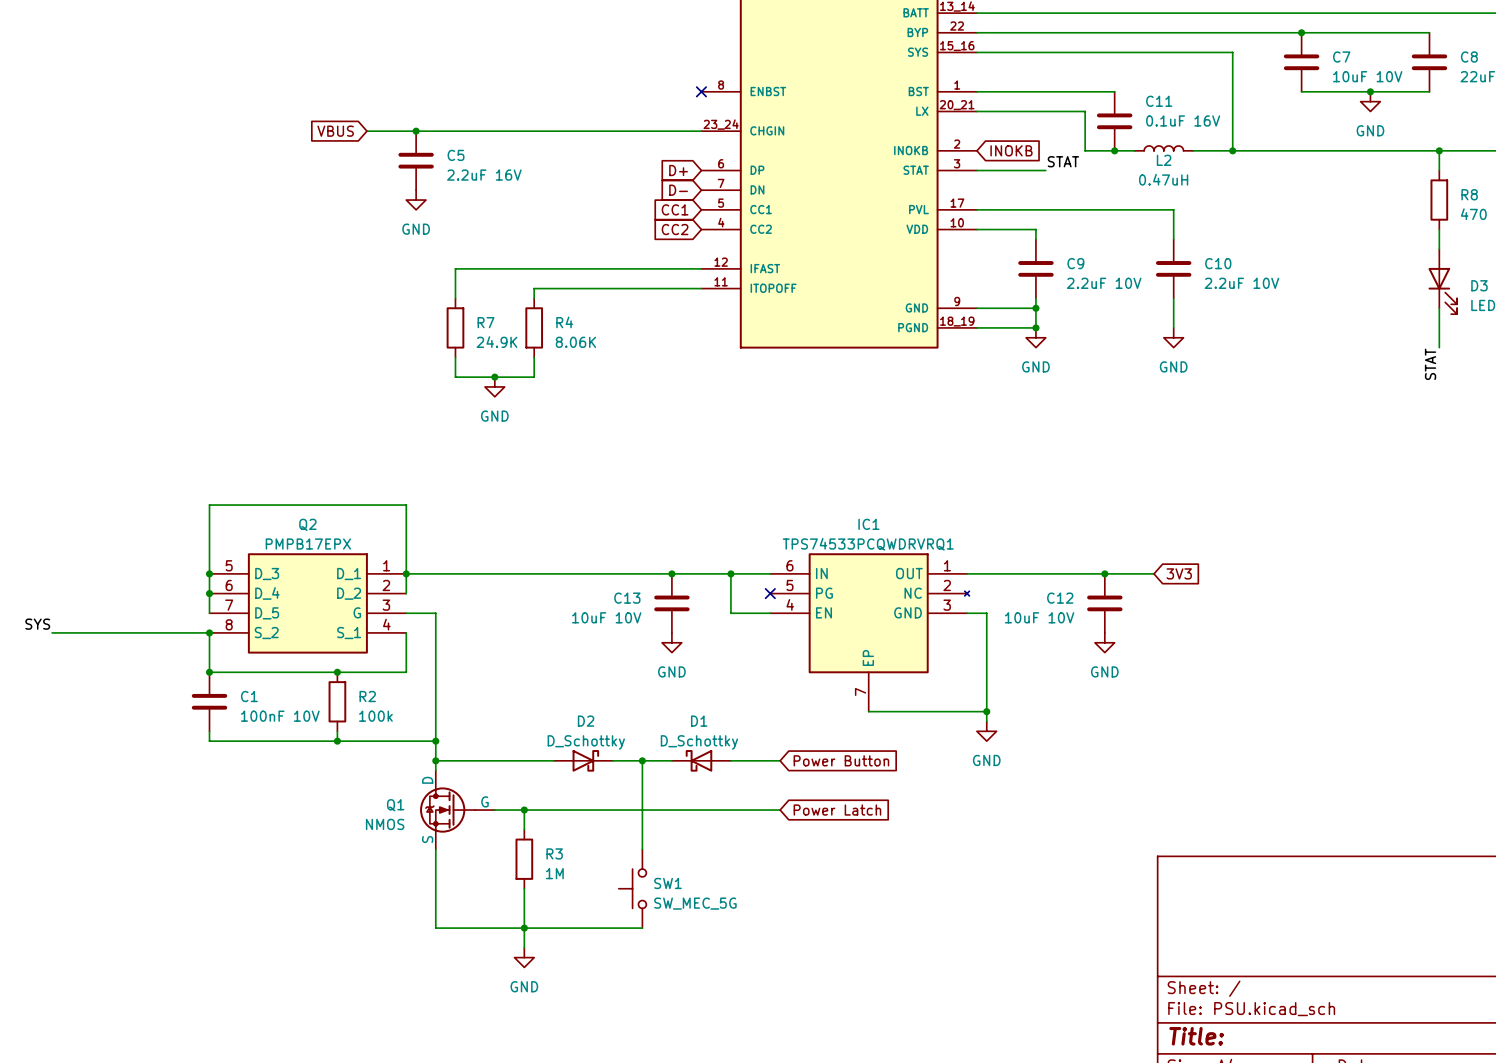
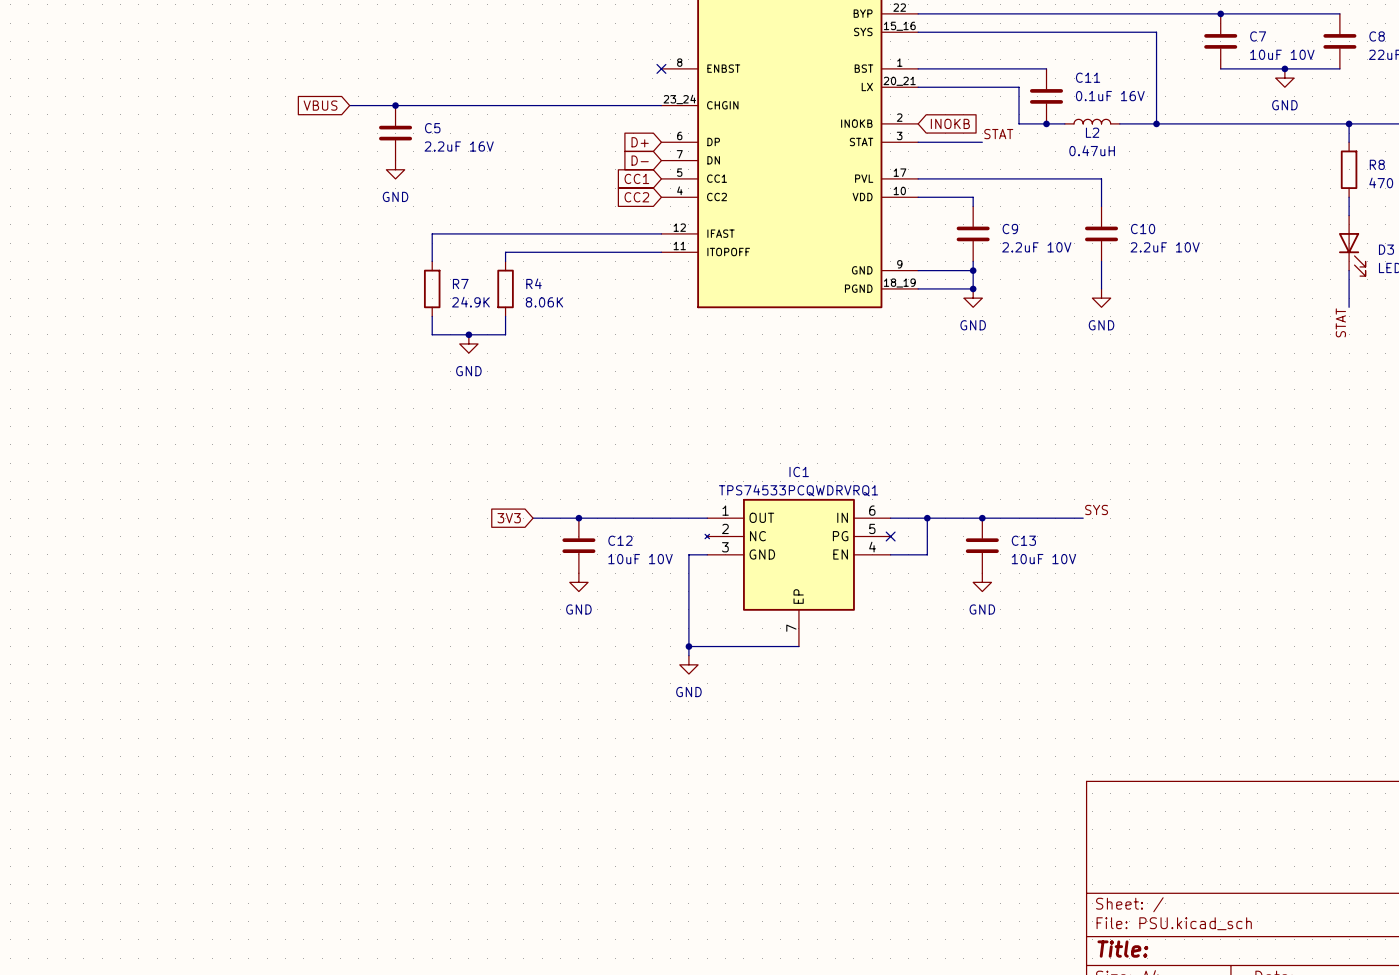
label: none -> SYS (1096, 509)
junction: (209, 573) -> none
wire: (406, 573) (563, 573) -> none
junction: (406, 573) -> none
global label: none -> 3V3 (509, 518)
junction: none -> (578, 518)
junction: (671, 573) -> none
wire: (730, 573) (730, 613) -> (688, 655) (688, 554)
junction: (730, 573) -> none
junction: none -> (927, 518)
junction: none -> (982, 518)
junction: (1104, 573) -> none
global label: 3V3 (1179, 573) -> none
junction: (209, 593) -> none
wire: (406, 593) (406, 505) (209, 505) (209, 613) -> none
no-connect mark: (770, 593) -> none
no-connect mark: none -> (890, 536)
C13 name position: C13 (627, 598) -> C13 (1023, 540)
C12 name position: C12 (1060, 598) -> C12 (620, 540)
Q2: PMPB17EPX (307, 603) -> none
C13 position: (671, 603) -> (982, 545)
C12 position: (1104, 603) -> (578, 545)
wire: (406, 613) (435, 613) (435, 770) -> none
IC1 flip: as is (889, 613) -> left-right (779, 554)
wire: (986, 613) (986, 721) -> (927, 554) (927, 518)
C13 value position: 10uF 10V (606, 617) -> 10uF 10V (1043, 559)
C12 value position: 10uF 10V (1039, 617) -> 10uF 10V (640, 559)
label: SYS (37, 624) -> none
wire: (52, 632) (209, 632) (209, 672) (406, 672) (406, 632) -> none
junction: (209, 632) -> none
power symbol: none -> GND (578, 582)
power symbol: GND (671, 642) -> none
power symbol: none -> GND (982, 582)
power symbol: GND (1104, 642) -> none
junction: (209, 672) -> none
junction: (337, 672) -> none
C1: 100nF 10V (209, 701) -> none
R2: 100k (337, 701) -> none
junction: none -> (688, 646)
wire: (868, 711) (986, 711) -> (688, 646) (798, 646)
junction: (986, 711) -> none
wire: (209, 731) (209, 741) (435, 741) -> none
wire: (337, 731) (337, 741) -> none
power symbol: none -> GND (688, 664)
power symbol: GND (986, 731) -> none
junction: (337, 741) -> none
junction: (435, 741) -> none
wire: (435, 760) (553, 760) -> none
junction: (435, 760) -> none
D2: D_Schottky (583, 760) -> none
wire: (612, 760) (671, 760) -> none
wire: (642, 760) (642, 849) -> none
junction: (642, 760) -> none
D1: D_Schottky (701, 760) -> none
wire: (730, 760) (780, 760) -> none
global label: Power Button (841, 760) -> none
Q1: NMOS (457, 810) -> none
wire: (494, 810) (780, 810) -> none
wire: (524, 810) (524, 829) -> none
junction: (524, 810) -> none
global label: Power Latch (837, 810) -> none
wire: (435, 849) (435, 928) (642, 928) -> none
R3: 1M (524, 859) -> none
wire: (524, 888) (524, 947) -> none
SW1: SW_MEC_5G (632, 888) -> none
junction: (524, 928) -> none
power symbol: GND (524, 957) -> none

